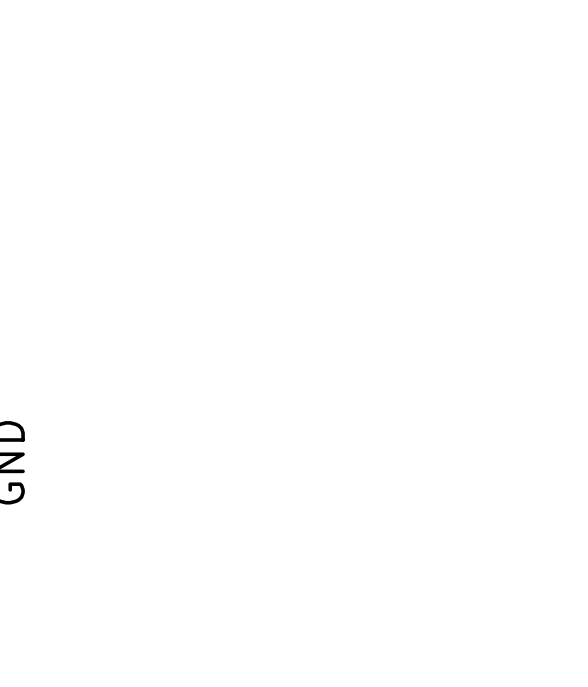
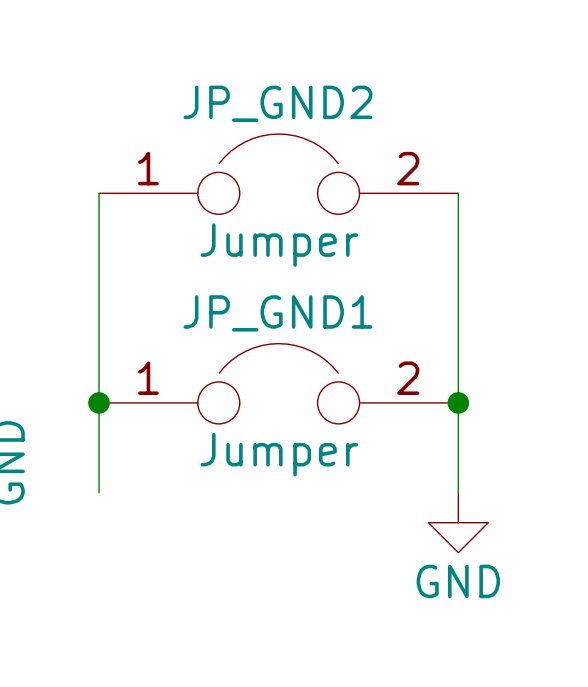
JP_GND2: none -> Jumper (278, 174)
wire: none -> (99, 193) (99, 492)
wire: none -> (458, 193) (458, 492)
JP_GND1: none -> Jumper (278, 383)
junction: none -> (99, 402)
junction: none -> (458, 402)
power symbol: none -> GND (458, 522)

